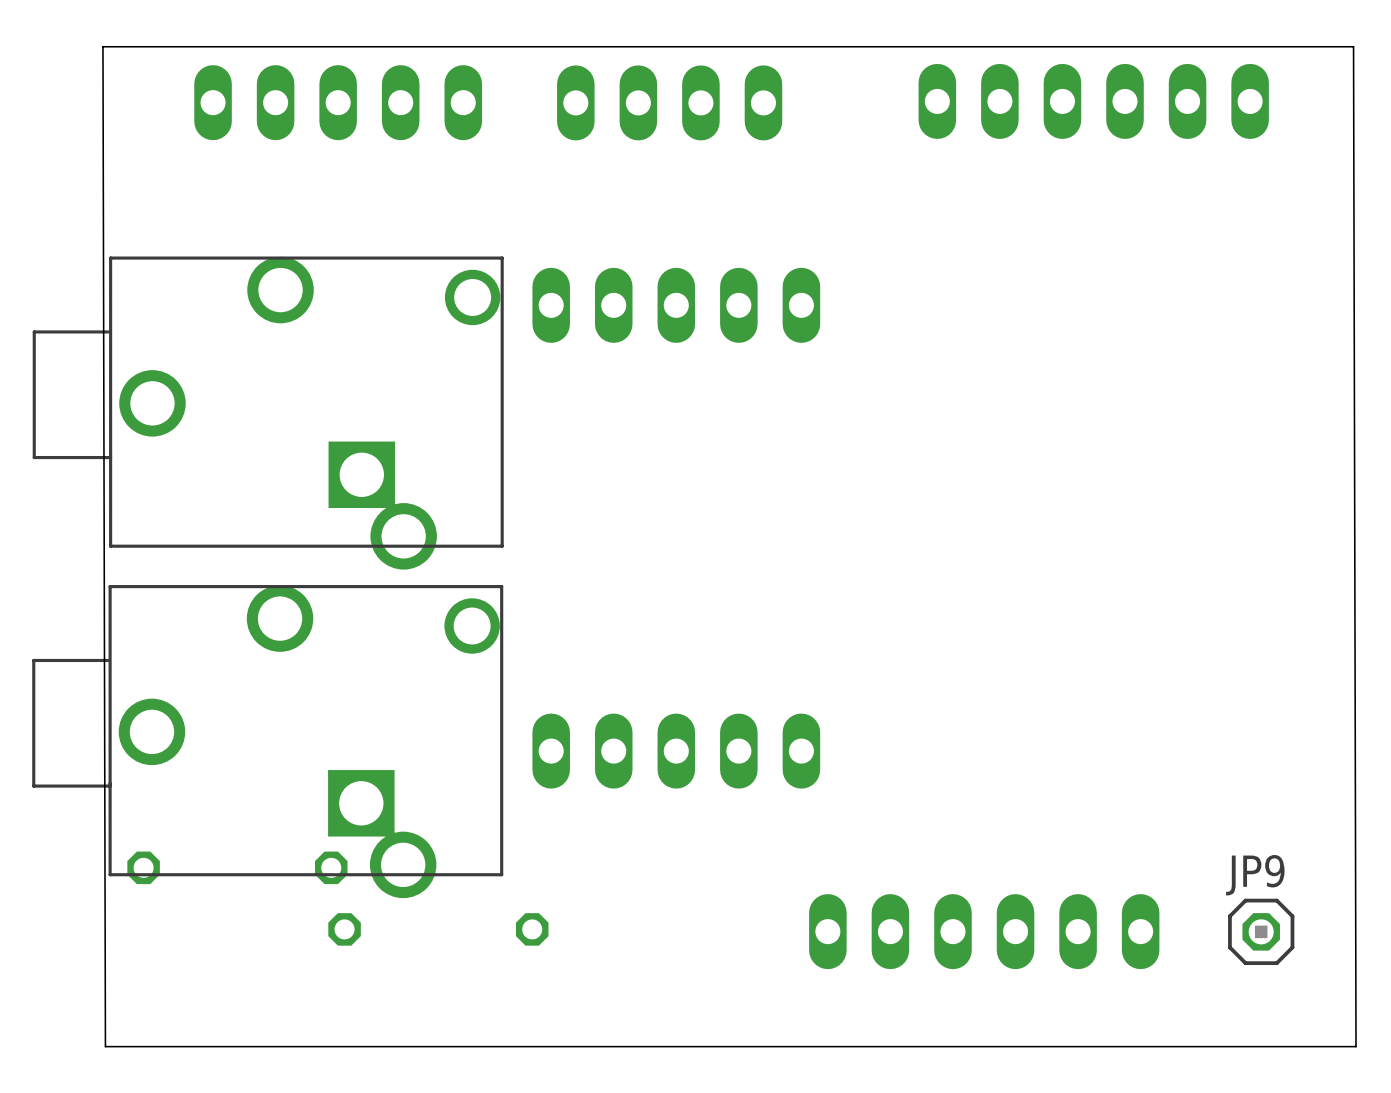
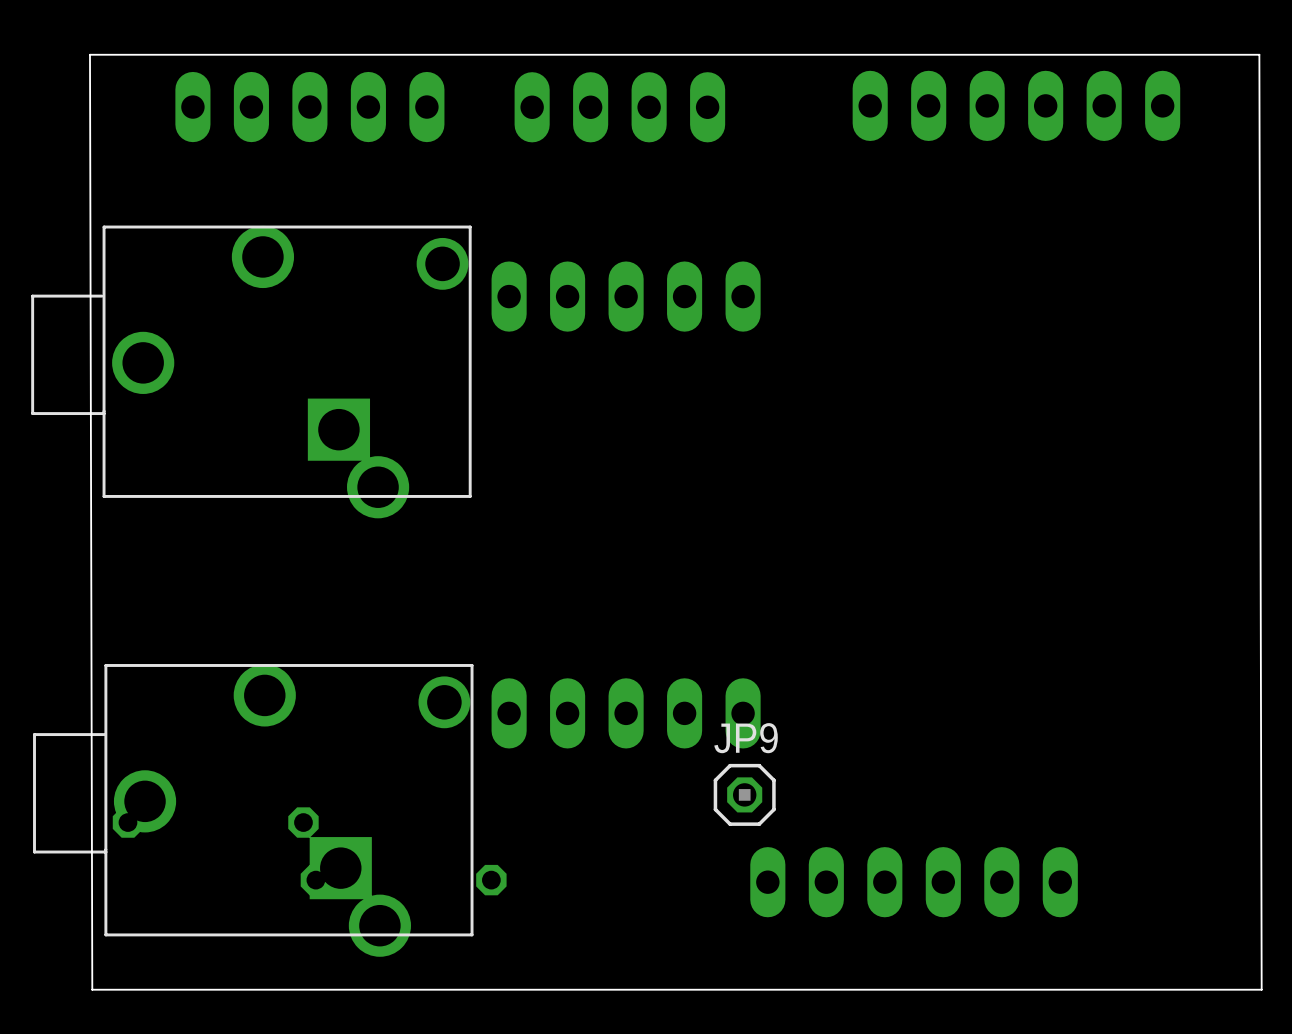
part position: (268, 413) -> (251, 371)
part position: (267, 741) -> (253, 810)
JP9 position: (1261, 931) -> (744, 794)

